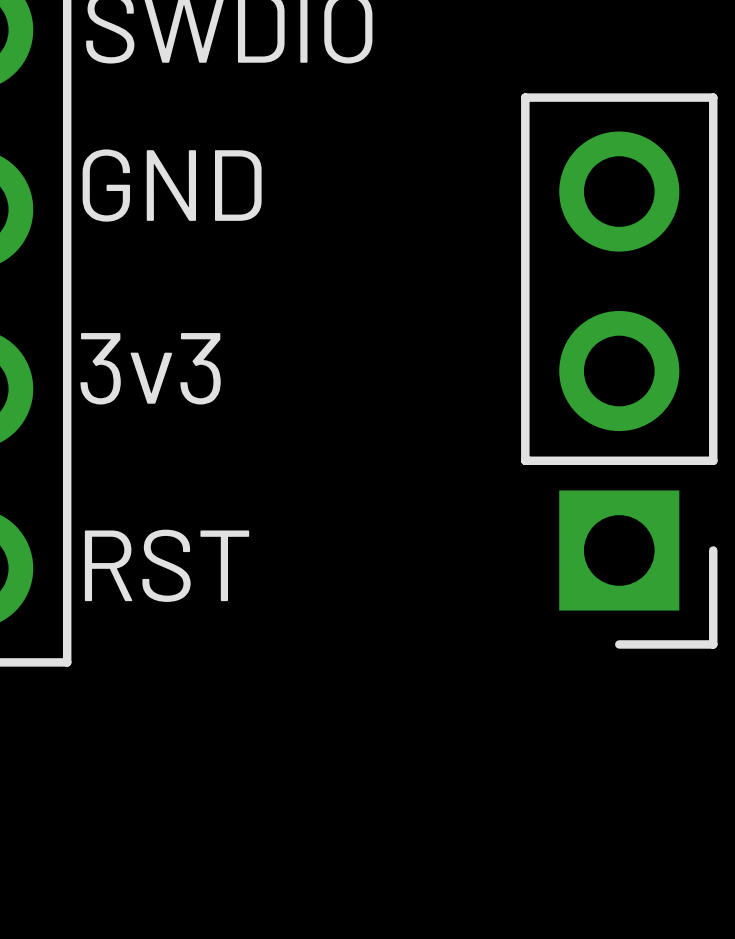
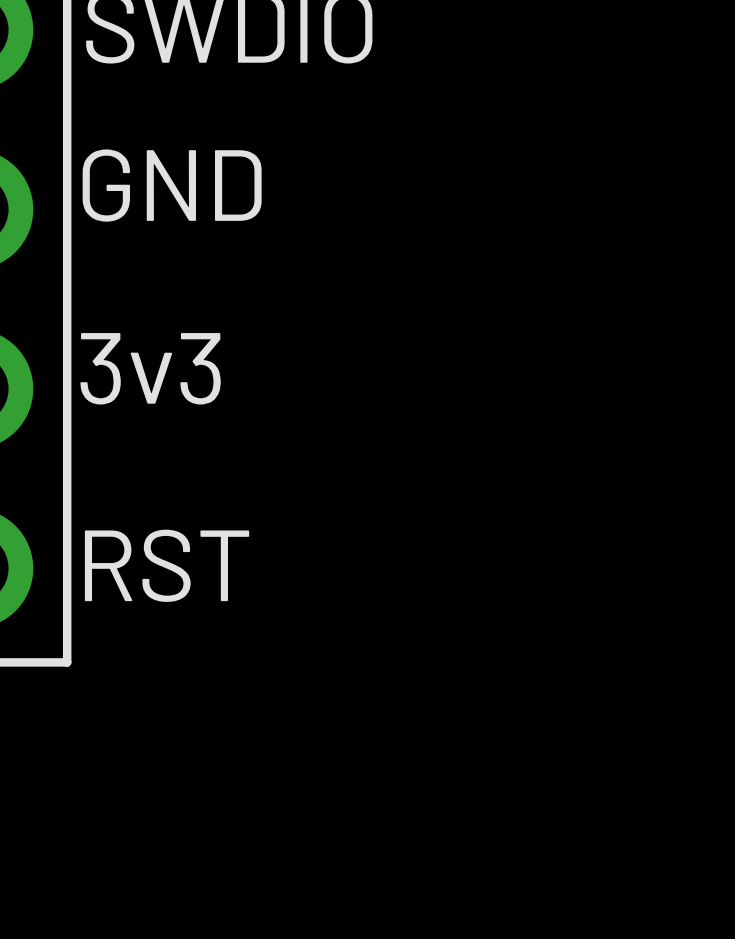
part: (619, 371) -> none

